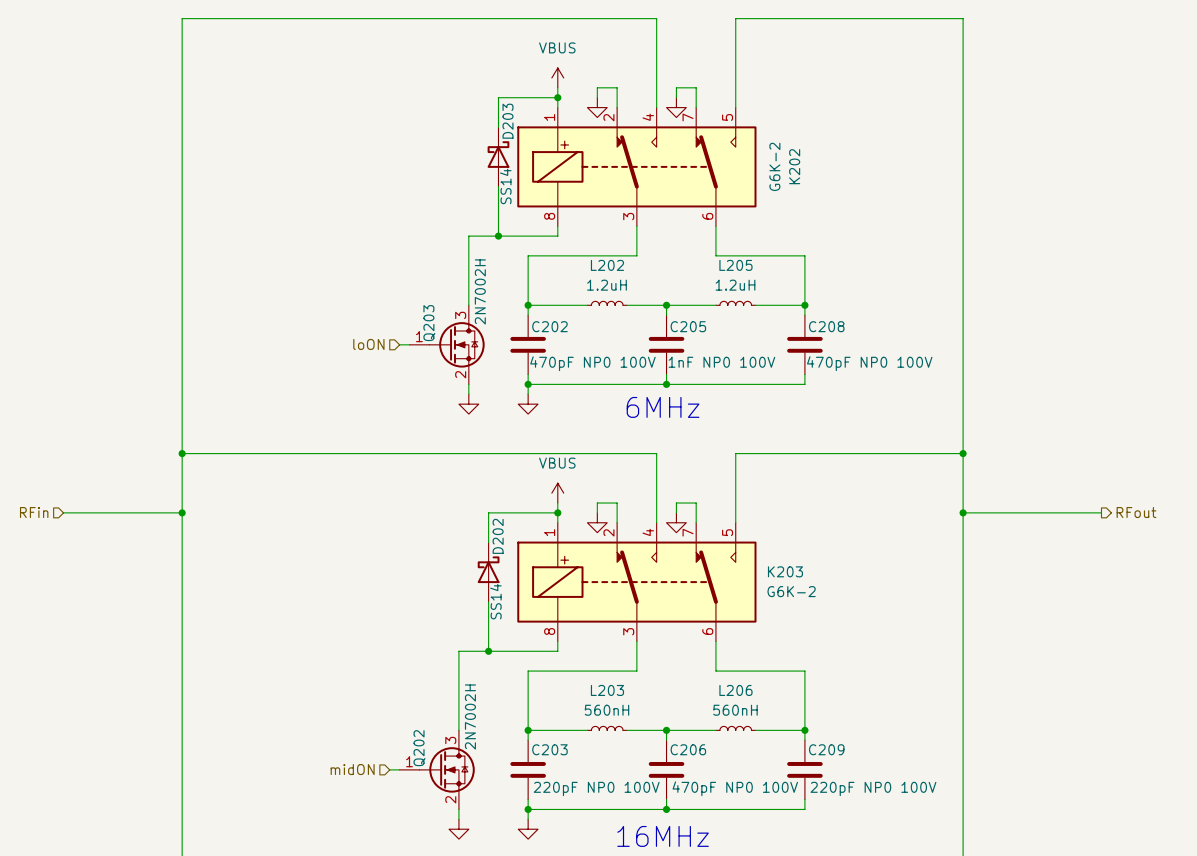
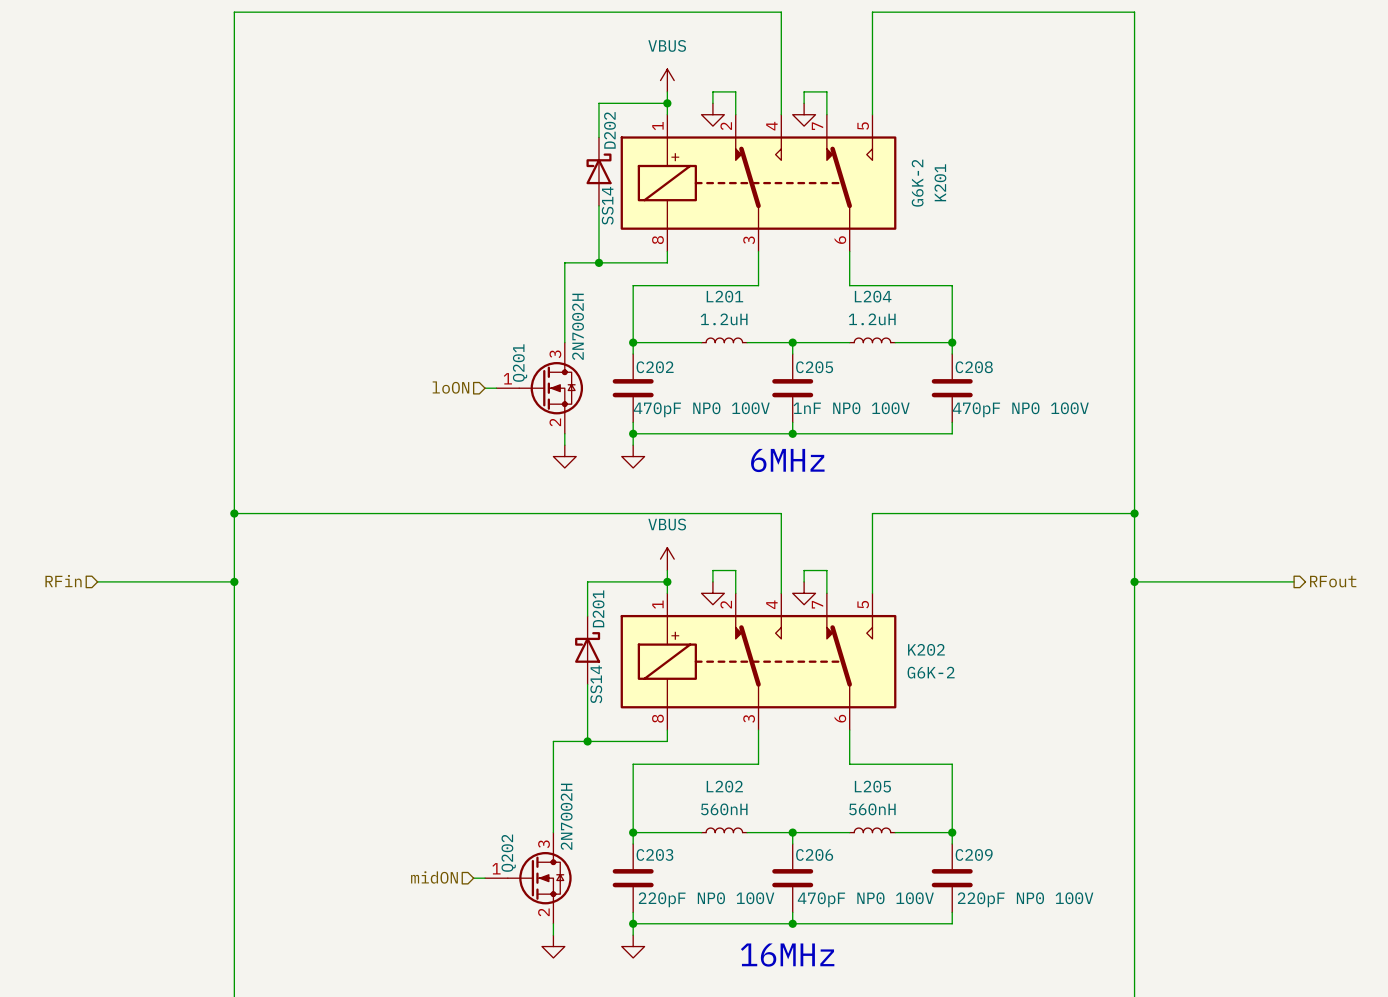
D203 name: D203 (508, 121) -> D202 (609, 130)
K202 name: K202 (794, 166) -> K201 (940, 182)
L202 name: L202 (607, 265) -> L201 (724, 296)
L205 name: L205 (735, 265) -> L204 (873, 296)
Q203 name: Q203 (429, 323) -> Q201 (520, 363)
D202 name: D202 (498, 536) -> D201 (598, 608)
K203 name: K203 (785, 571) -> K202 (926, 649)
L203 name: L203 (607, 690) -> L202 (724, 786)
L206 name: L206 (735, 690) -> L205 (872, 786)

